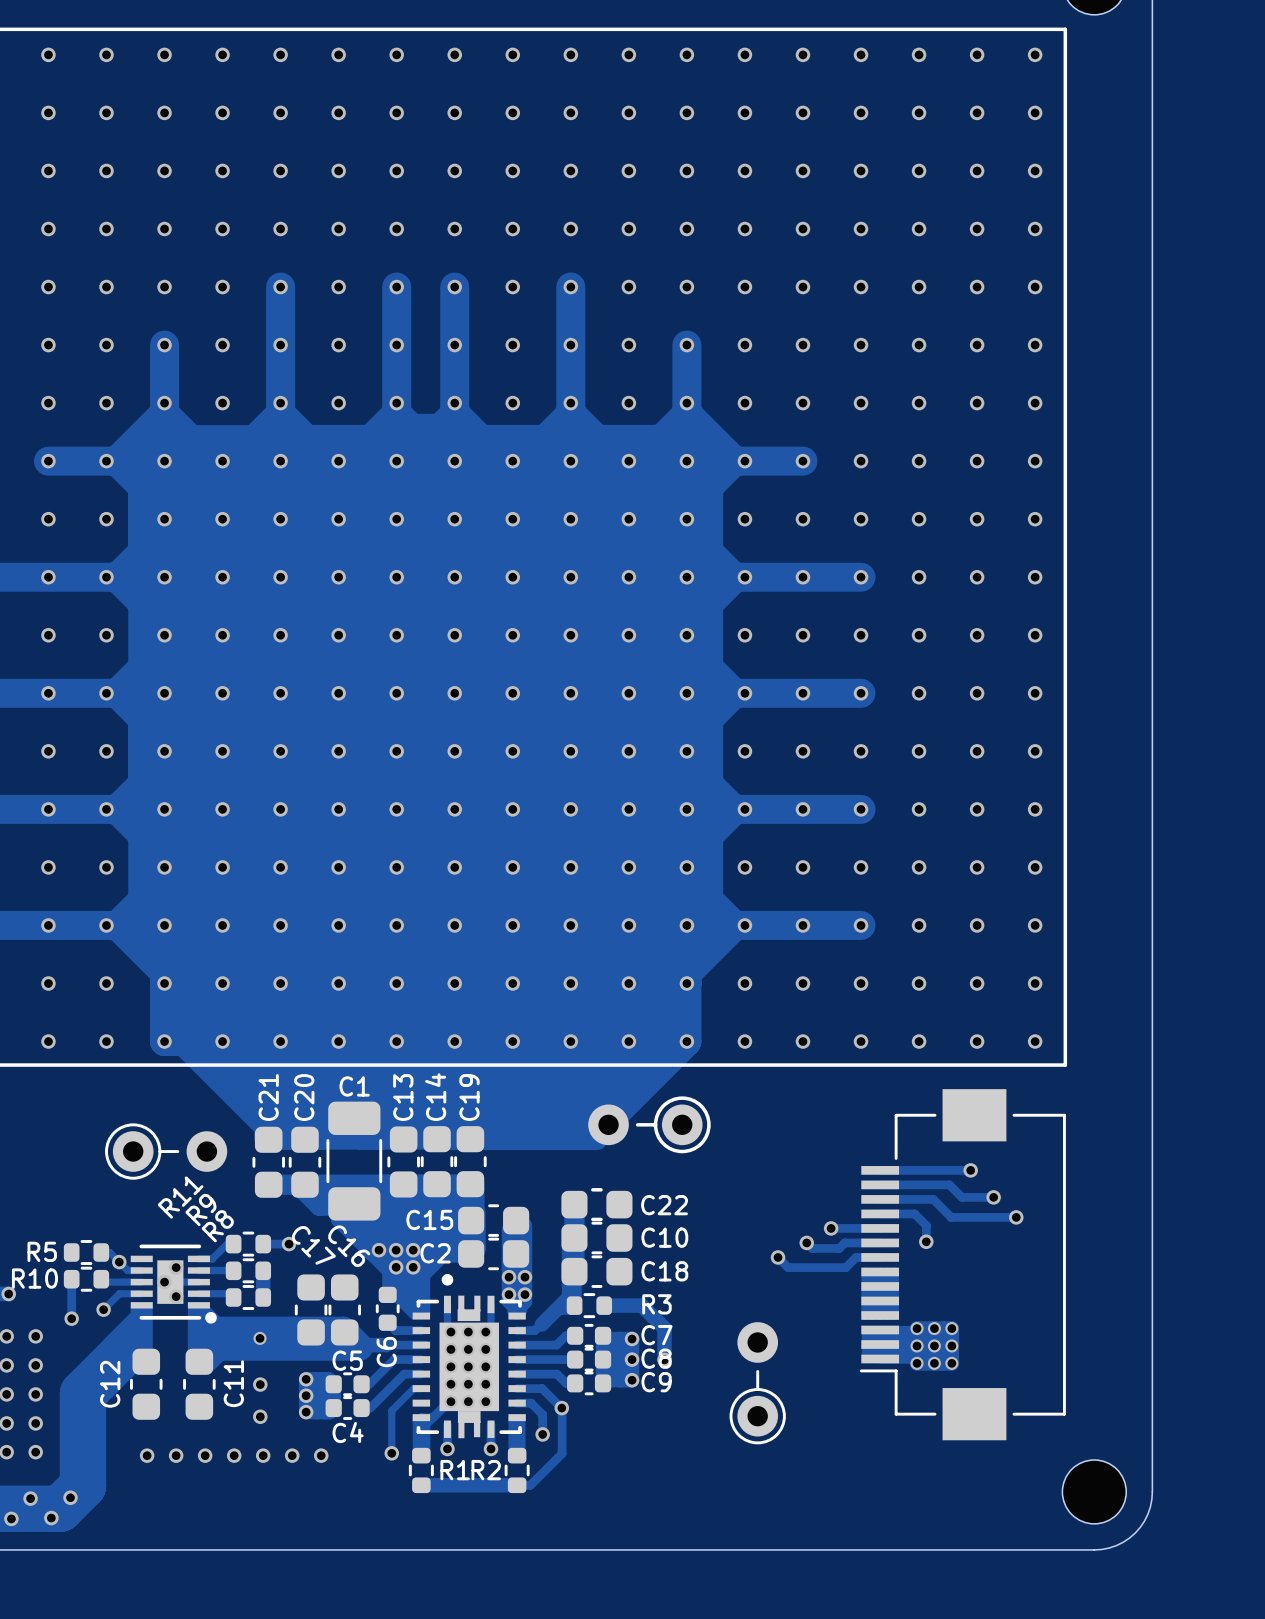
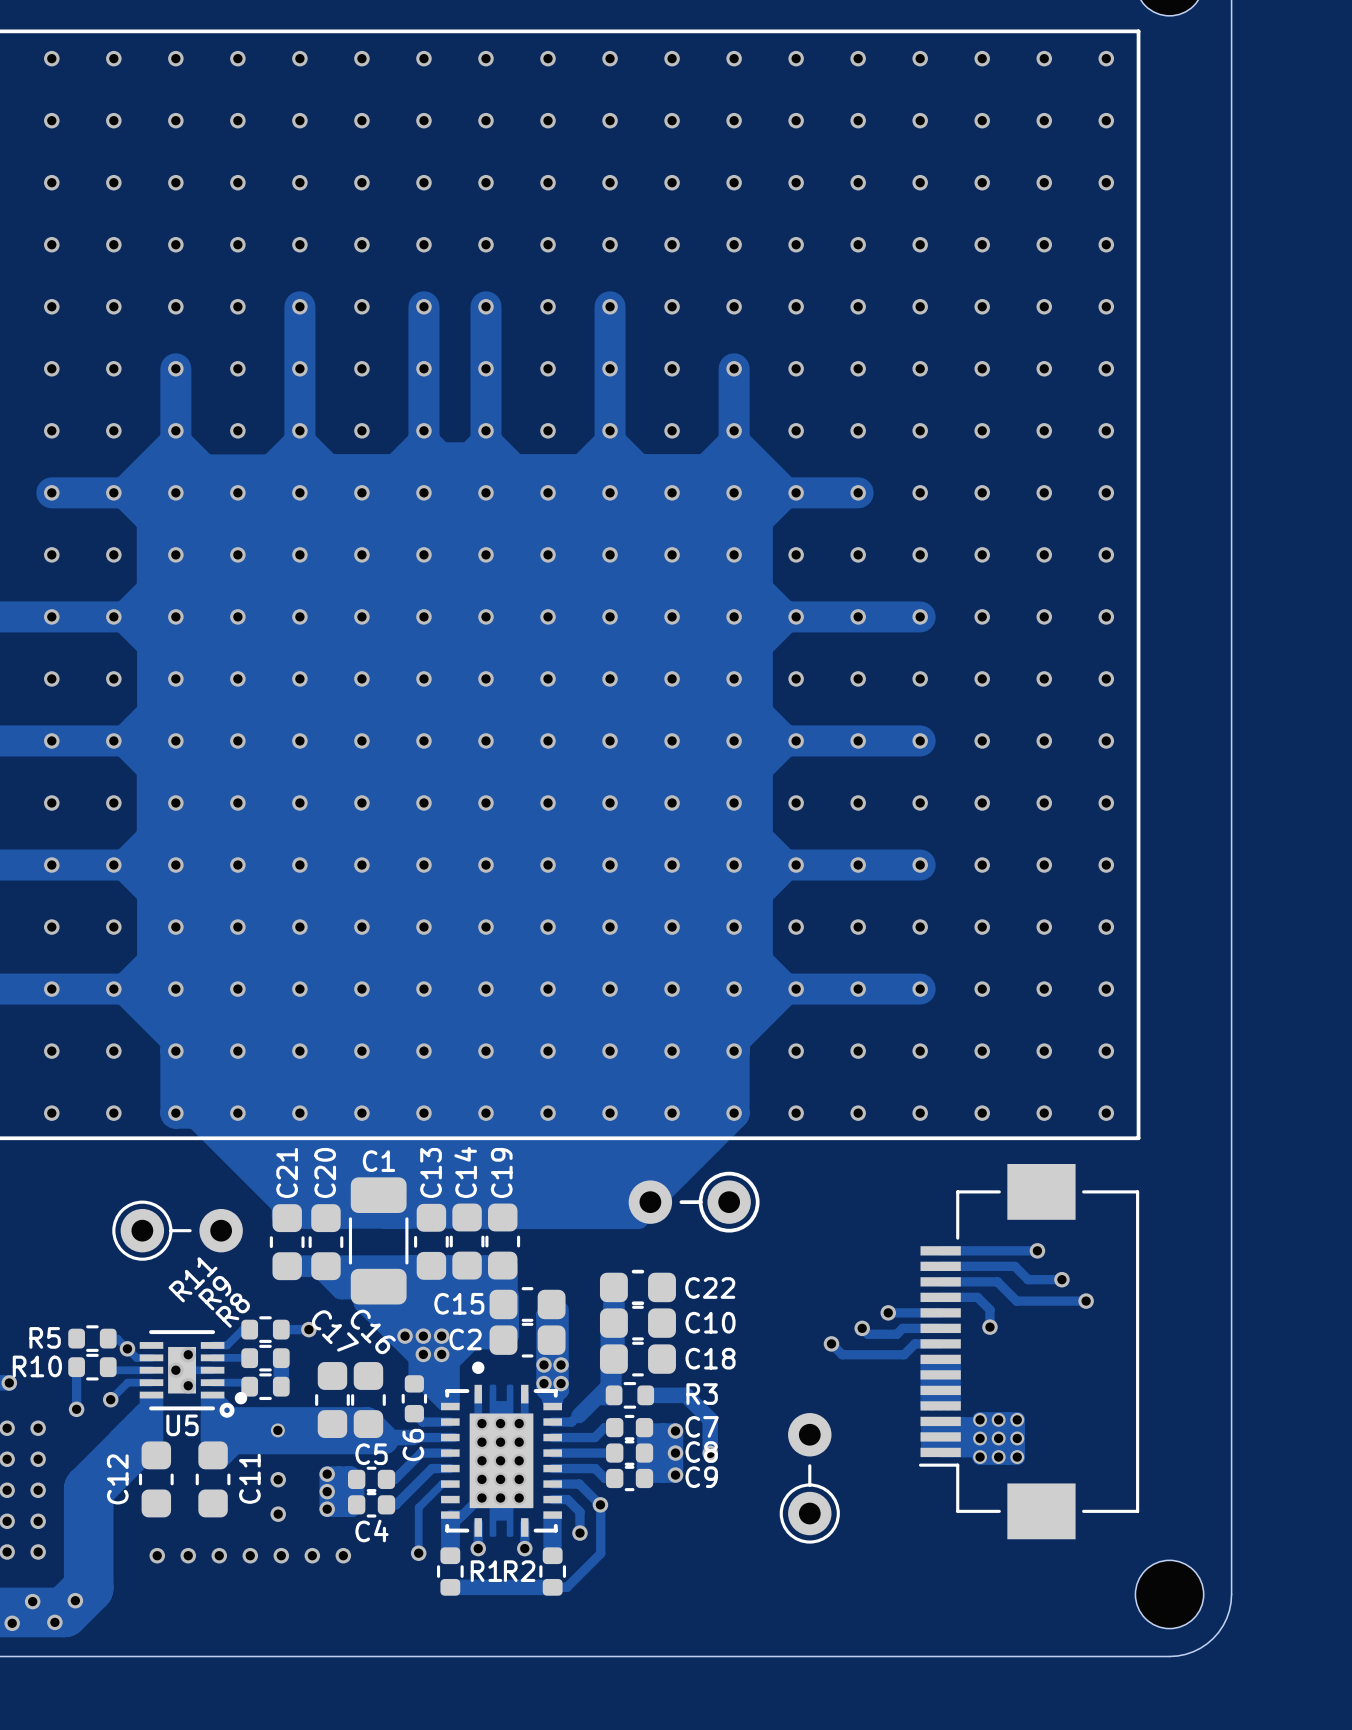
part footprint: [412, 1273, 526, 1439] -> [441, 1361, 562, 1537]
U5: none -> (193, 1370)
part: (173, 1284) -> none
drawing: none -> [219, 1402, 235, 1418]

